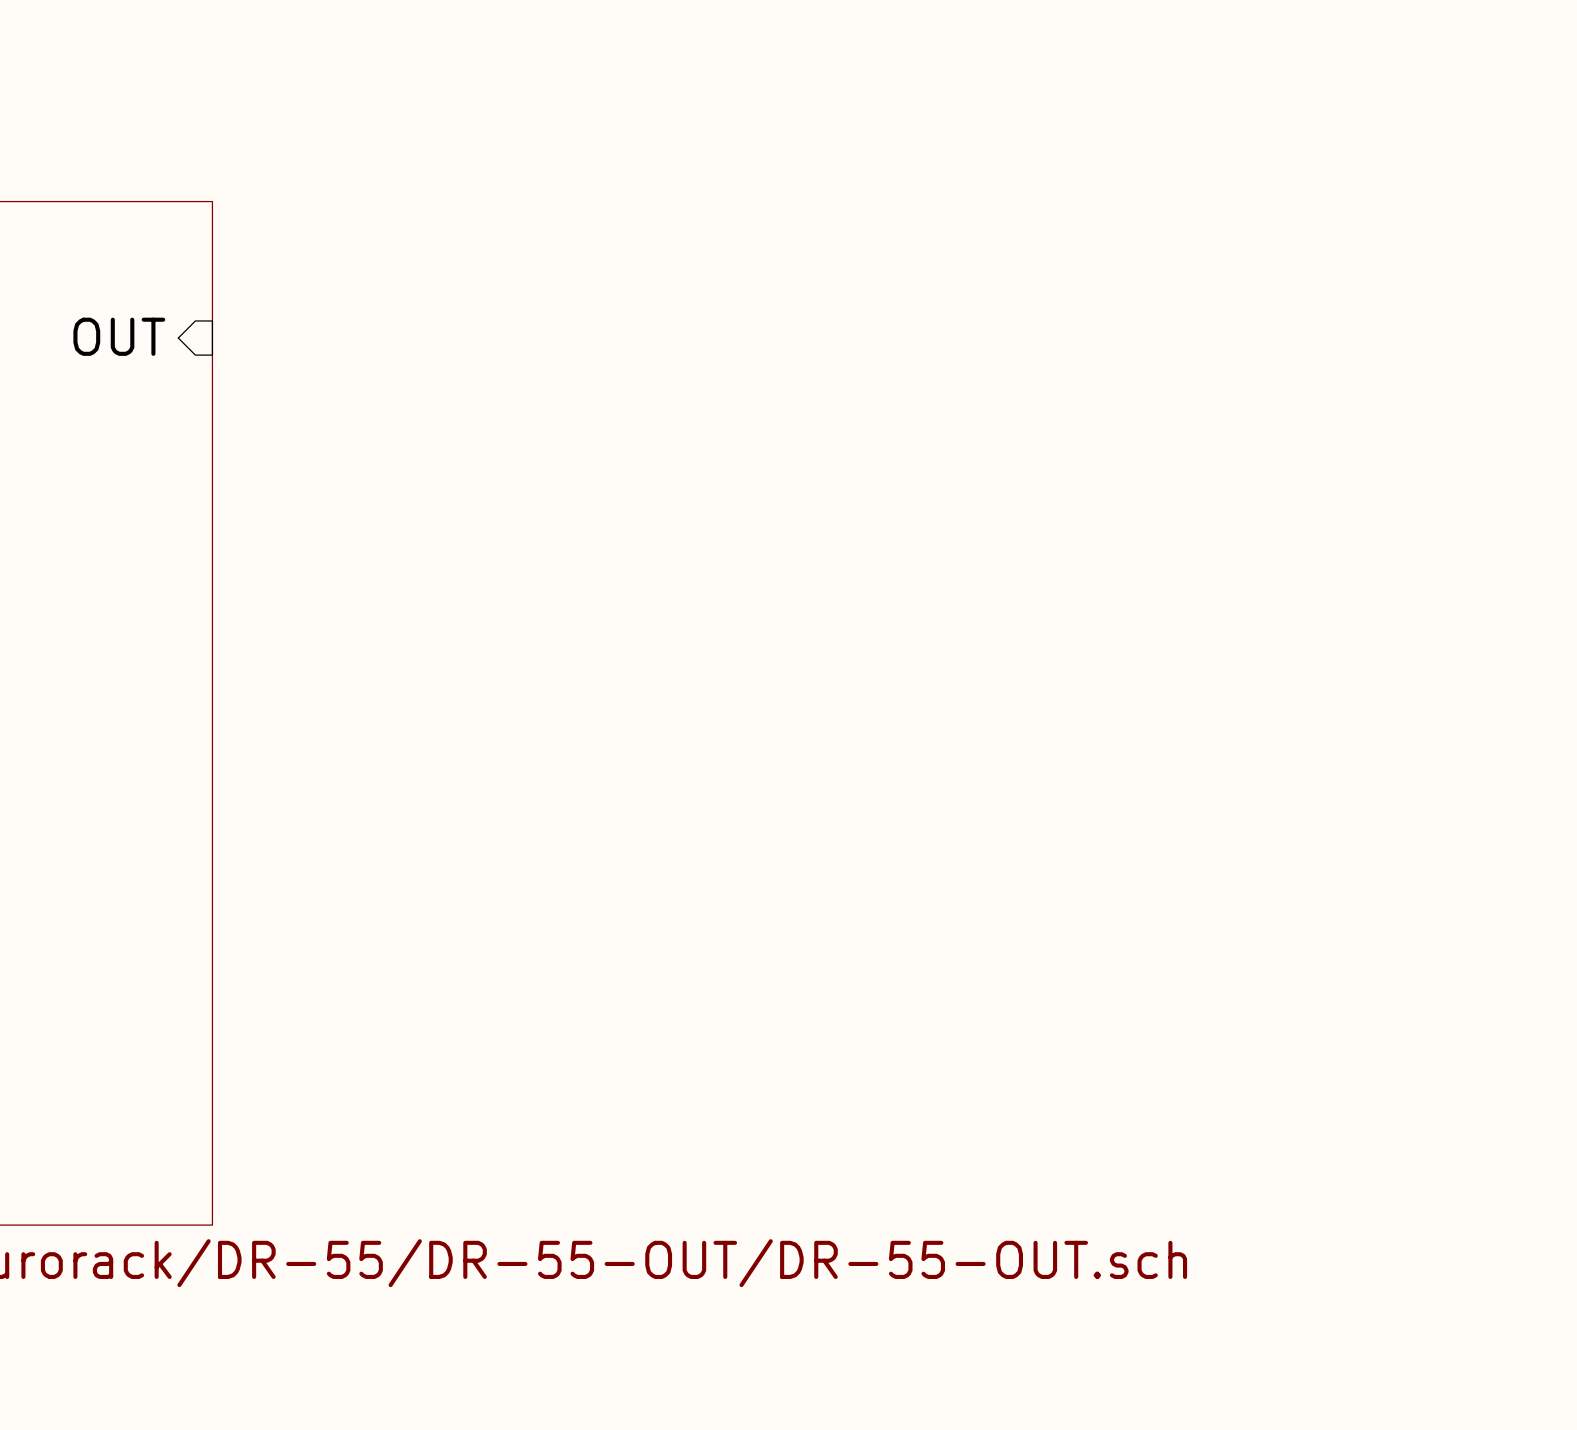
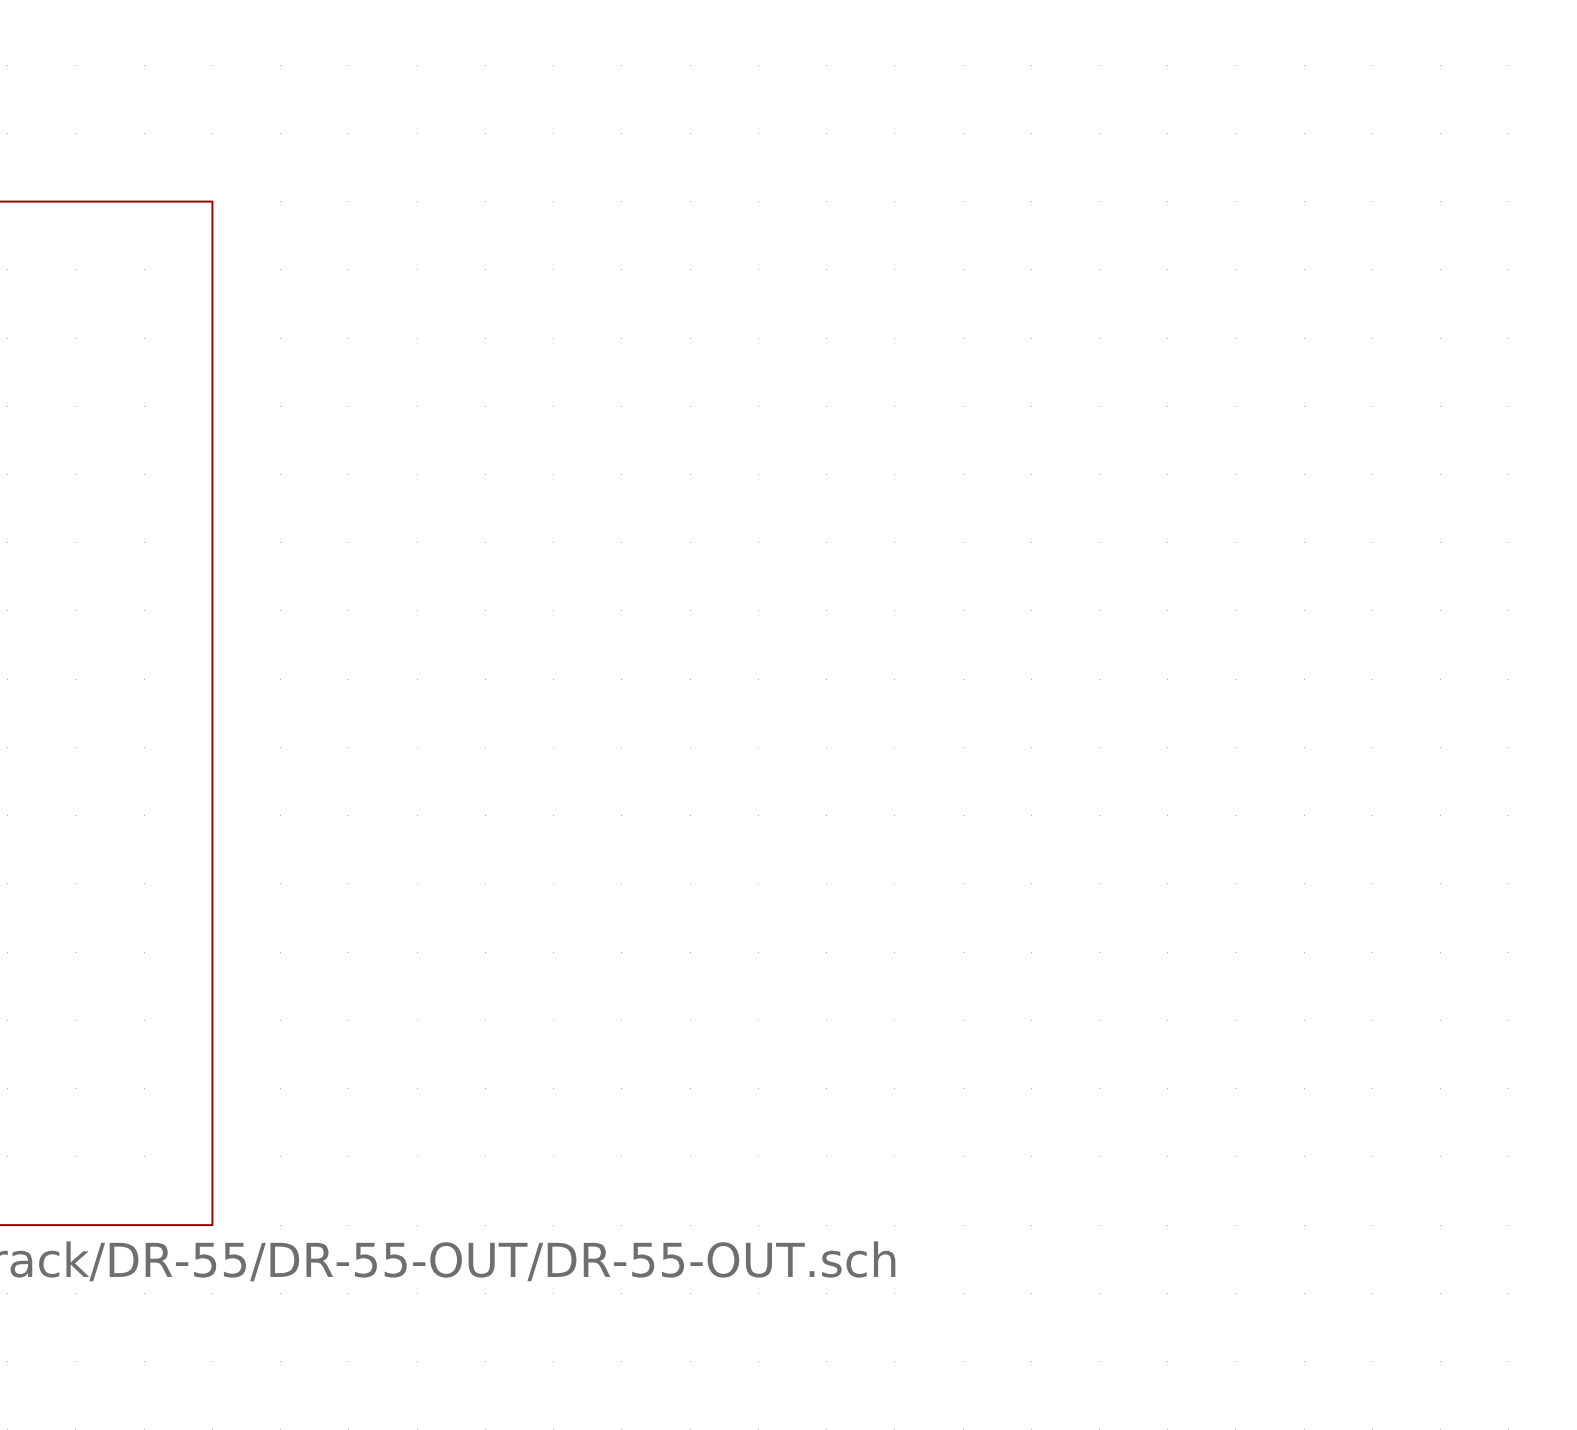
sheet pin: OUT (119, 336) -> none

